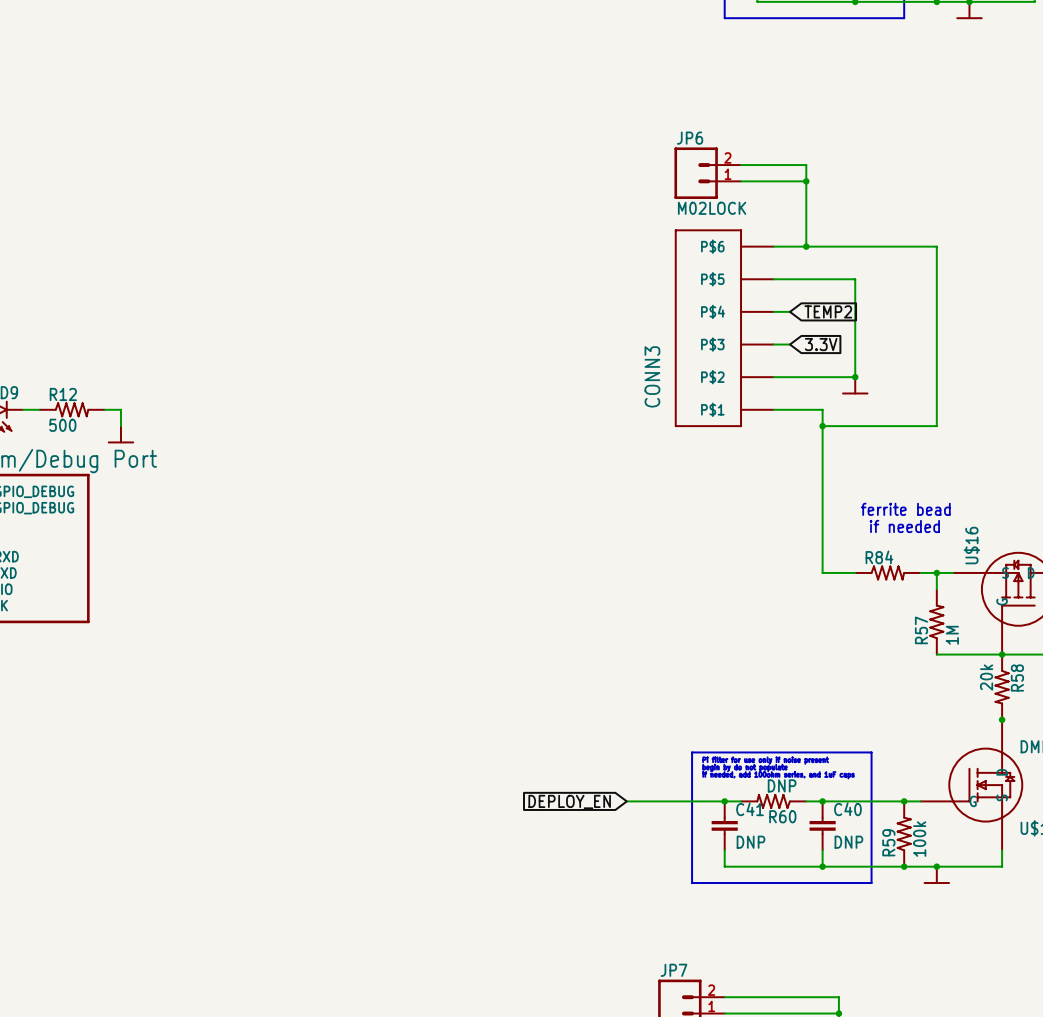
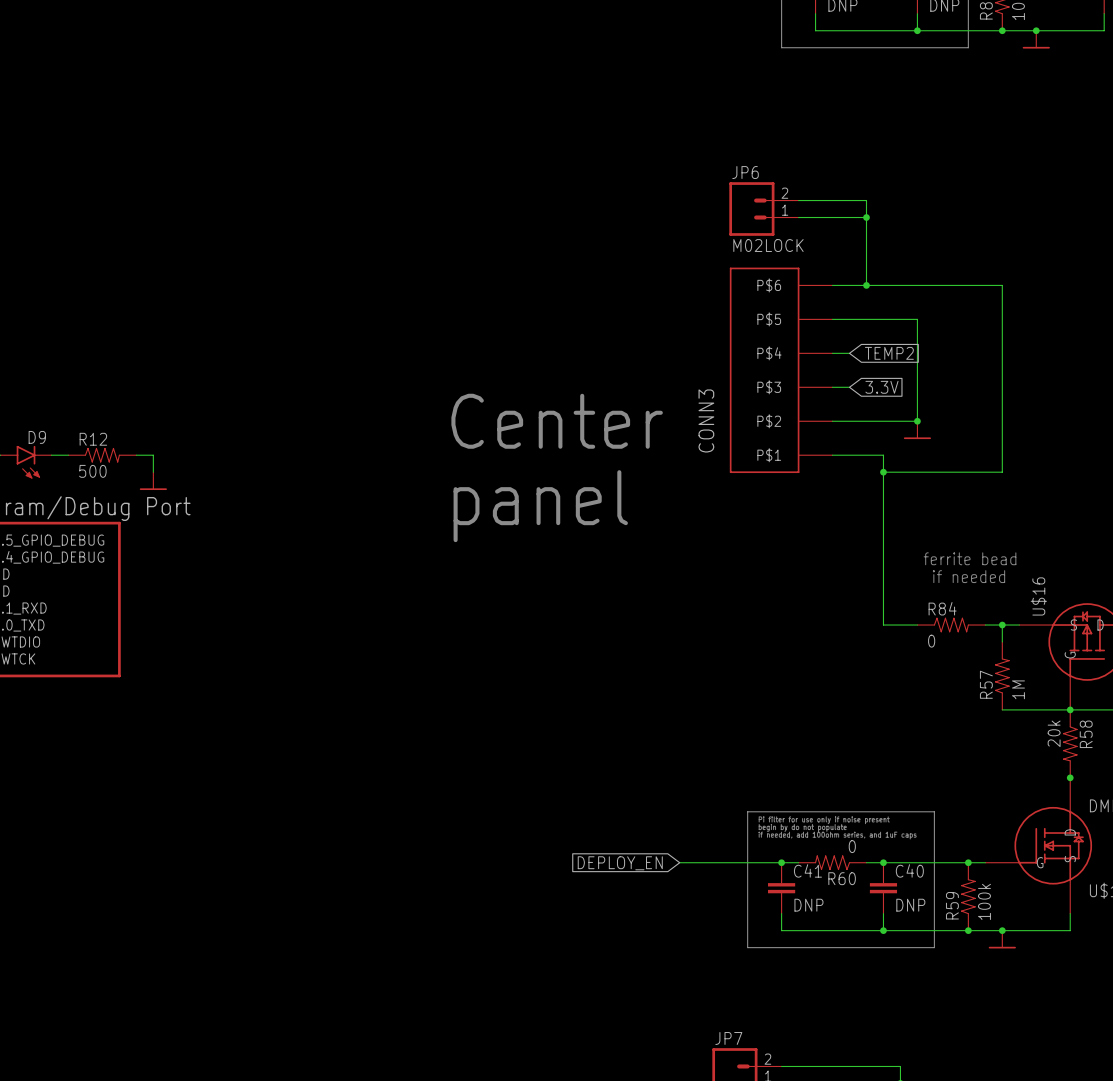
text: none -> Center (557, 421)
text: none -> panel (540, 506)
R84 value: none -> 0 (931, 641)
R60 value: DNP (782, 785) -> 0 (852, 846)

